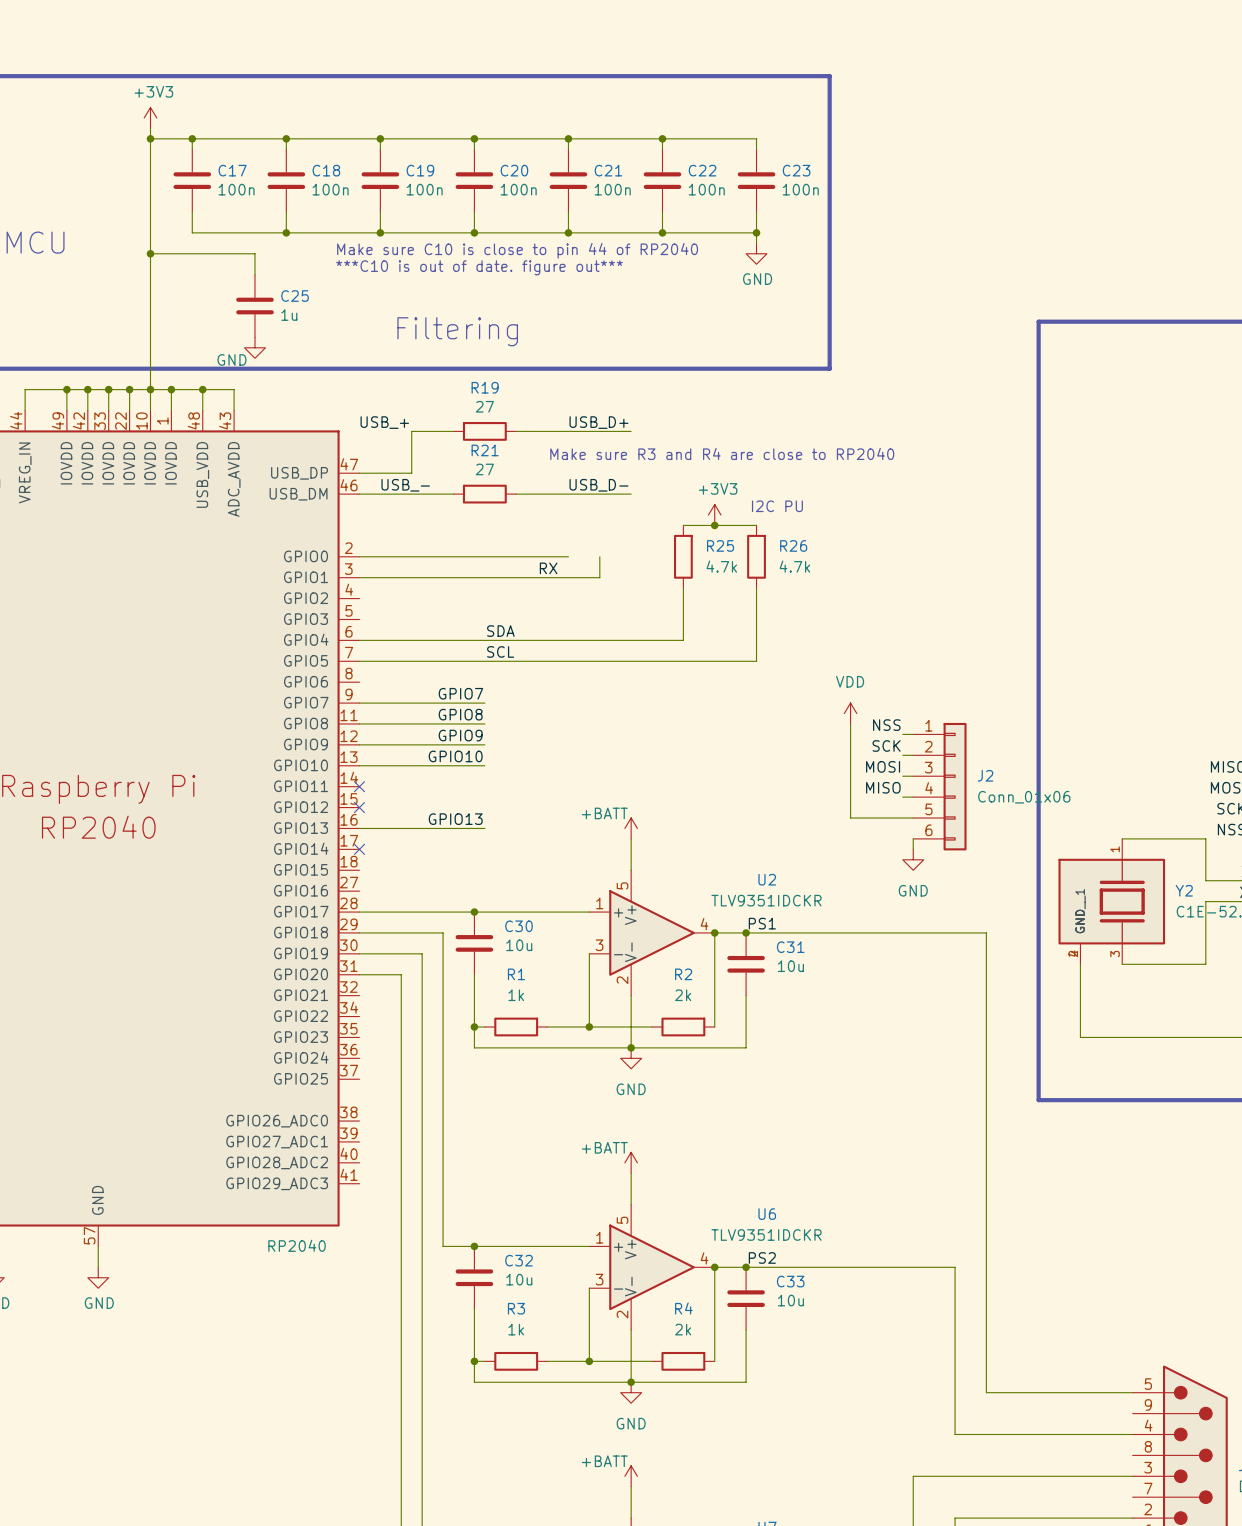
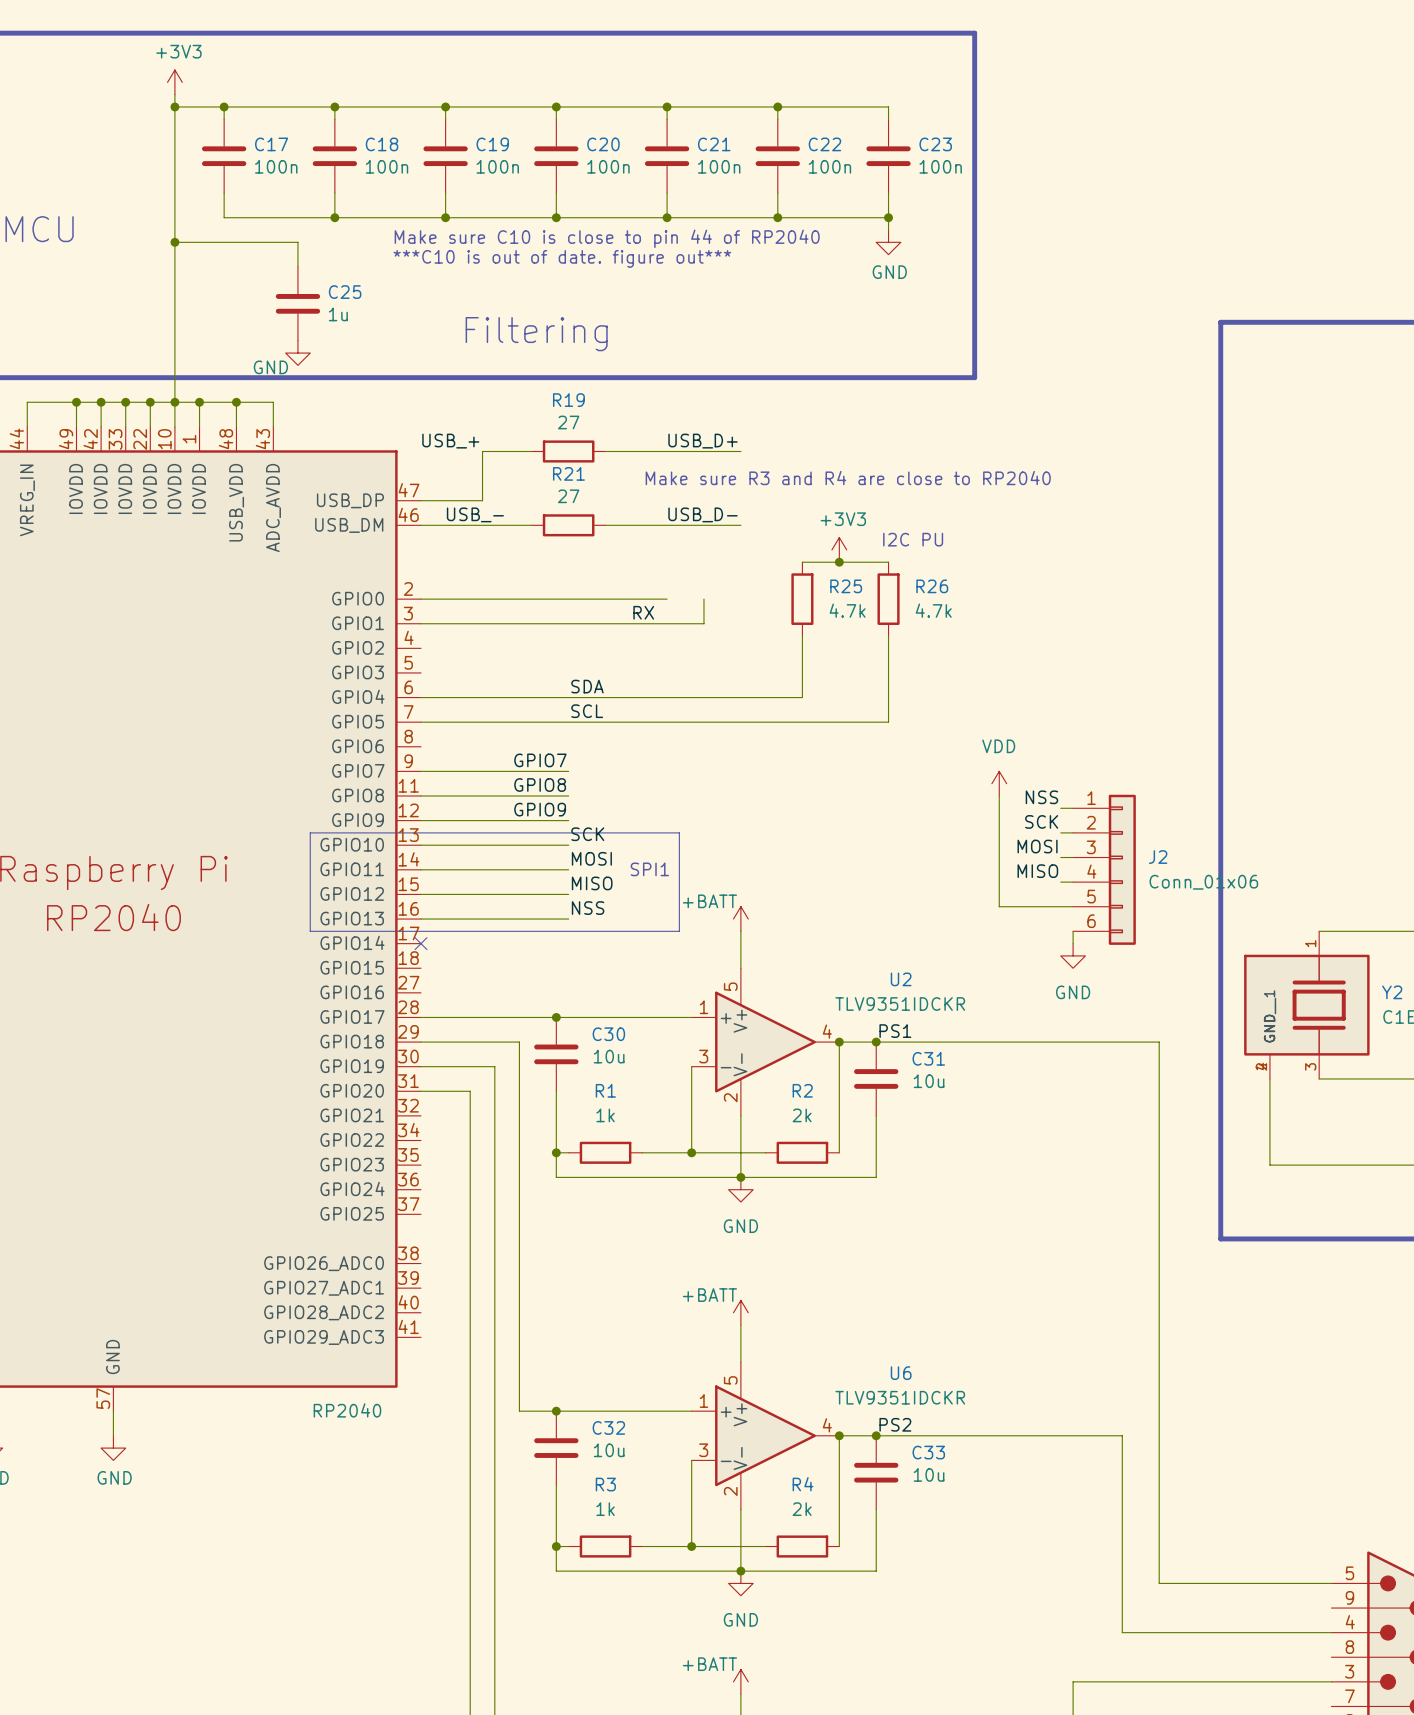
line: none -> (310, 832) (679, 832) (679, 931) (310, 931) (310, 832)
label: GPIO10 (455, 756) -> SCK (587, 834)
label: none -> MOSI (591, 858)
wire: none -> (421, 869) (568, 869)
no-connect mark: (359, 786) -> none
text: none -> SPI1 (649, 869)
label: none -> MISO (592, 883)
wire: none -> (421, 894) (568, 894)
no-connect mark: (359, 807) -> none
label: GPIO13 (455, 819) -> NSS (588, 908)

